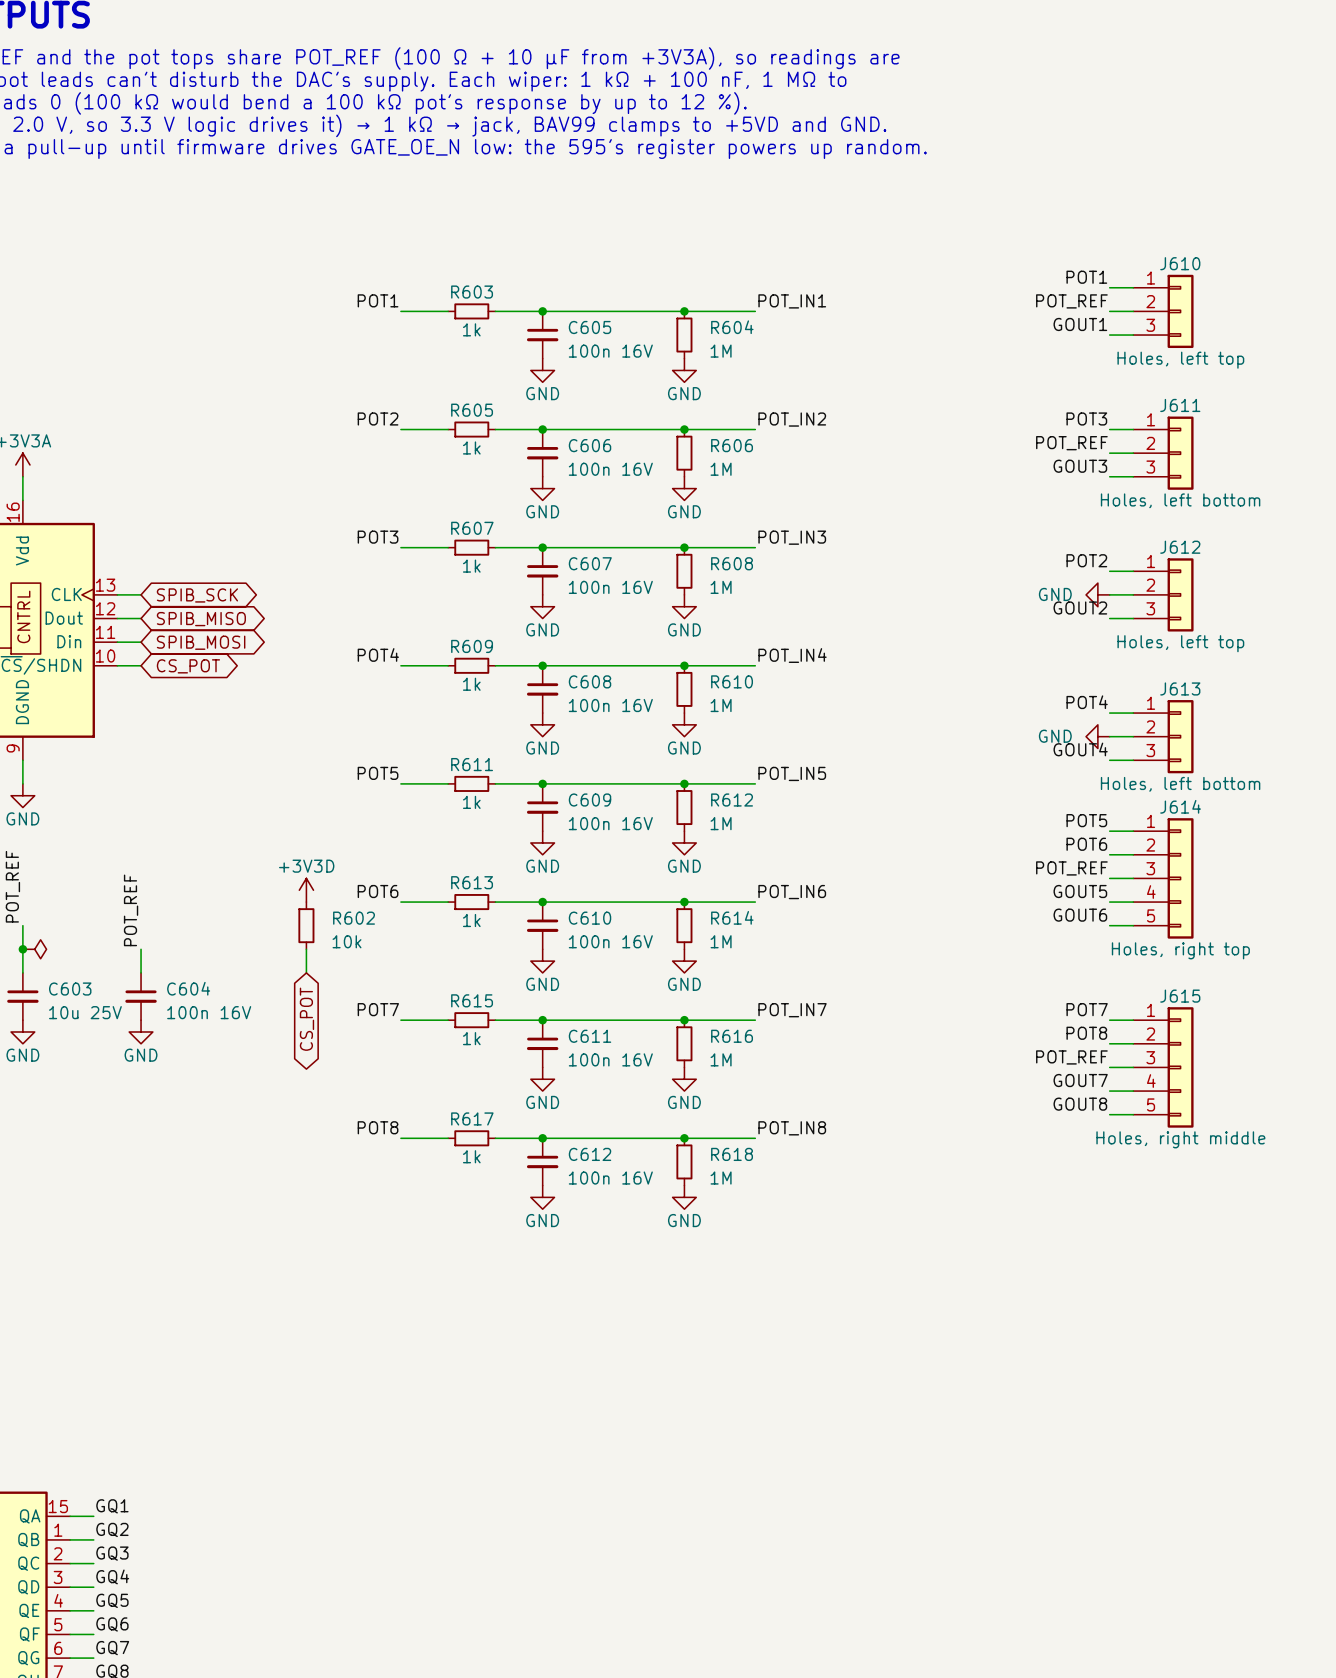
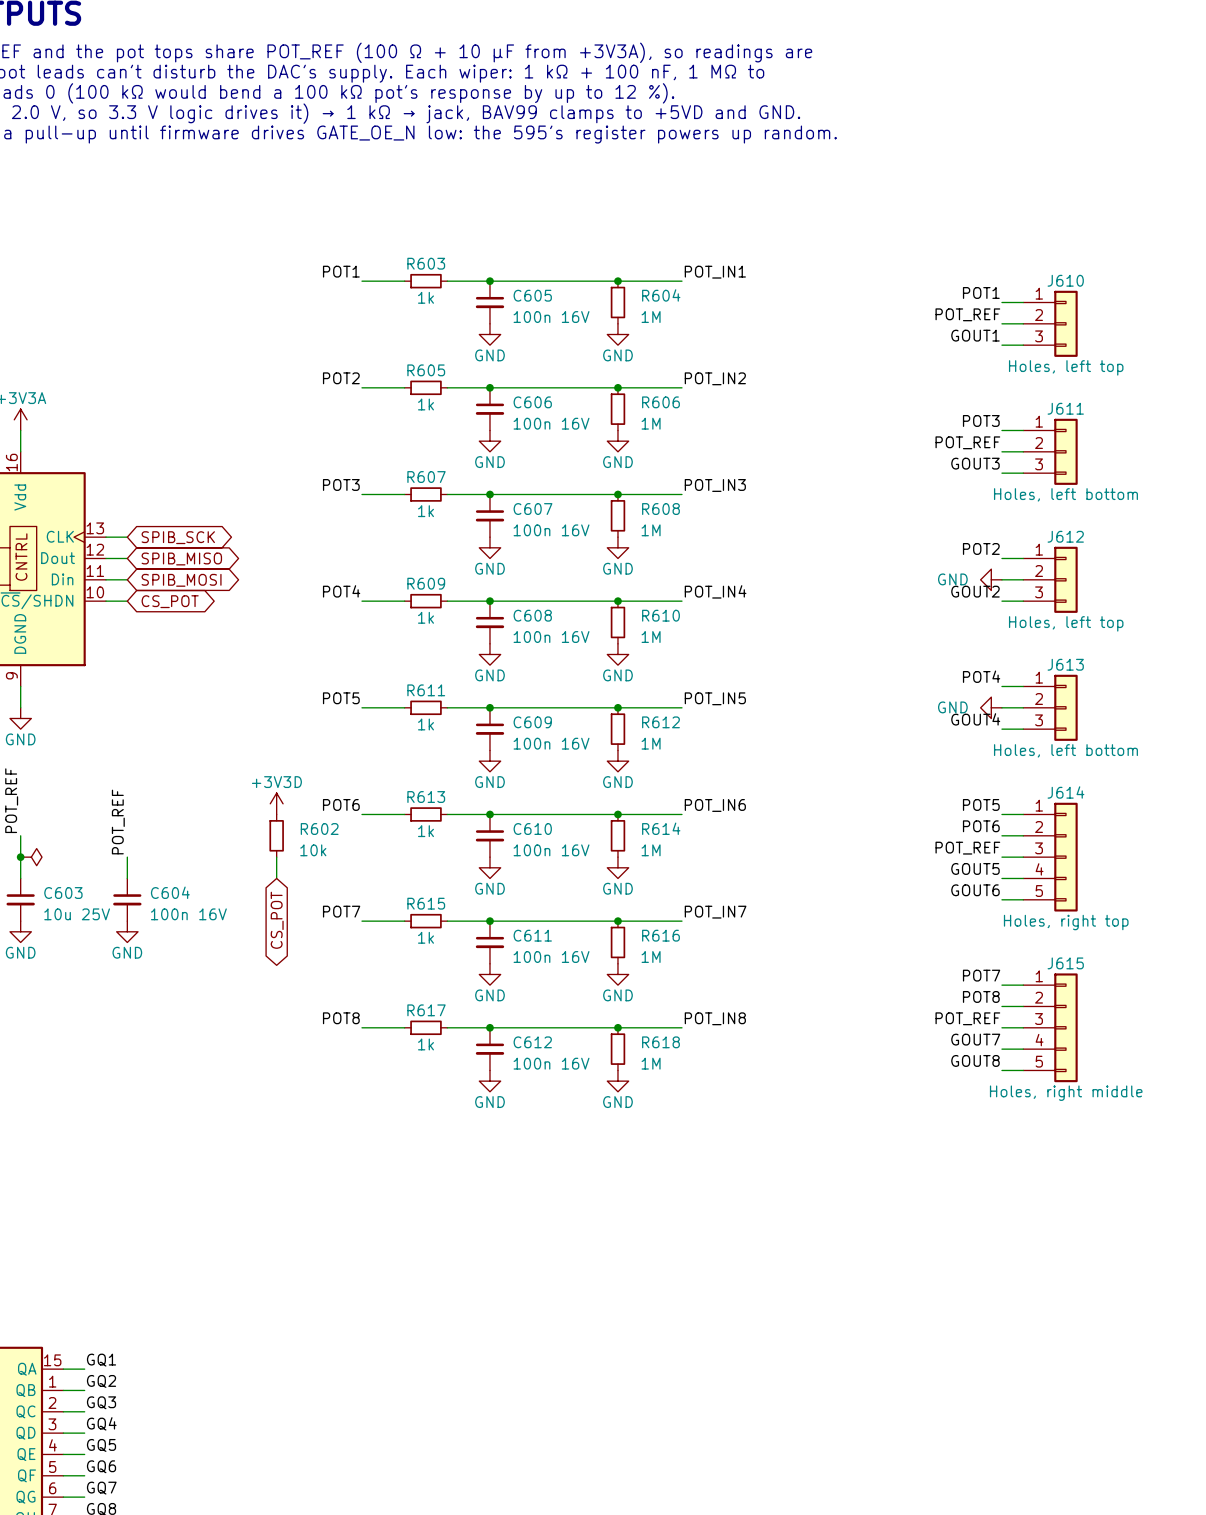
label: POT1 (1086, 277) -> none
wire: (1109, 287) (1133, 287) -> none
label: POT_REF (1071, 301) -> none
wire: (1109, 311) (1133, 311) -> none
J610 position: (1163, 311) -> (1050, 323)
label: GOUT1 (1080, 324) -> POT1 (981, 292)
label: none -> POT_REF (967, 314)
label: none -> GOUT1 (975, 335)
label: POT3 (1086, 418) -> none
wire: (1109, 429) (1133, 429) -> (1001, 323) (1023, 323)
label: POT_REF (1071, 443) -> none
wire: (1109, 453) (1133, 453) -> (1001, 345) (1023, 345)
J611 position: (1163, 453) -> (1050, 451)
label: GOUT3 (1080, 466) -> POT3 (981, 420)
label: none -> POT_REF (967, 442)
label: none -> GOUT3 (975, 463)
label: POT2 (1086, 560) -> none
wire: (1109, 571) (1133, 571) -> (1001, 451) (1023, 451)
power symbol: GND (1097, 594) -> none
wire: (1109, 594) (1133, 594) -> (1001, 473) (1023, 473)
J612 position: (1163, 594) -> (1050, 579)
label: GOUT2 (1080, 607) -> POT2 (981, 548)
power symbol: none -> GND (991, 579)
label: none -> GOUT2 (975, 591)
label: POT4 (1087, 702) -> none
wire: (1109, 713) (1133, 713) -> (1001, 579) (1023, 579)
power symbol: GND (1097, 736) -> none
wire: (1109, 736) (1133, 736) -> (1001, 601) (1023, 601)
J613 position: (1163, 736) -> (1050, 707)
label: GOUT4 (1080, 749) -> POT4 (981, 676)
power symbol: none -> GND (991, 707)
label: none -> GOUT4 (975, 719)
label: POT5 (1086, 820) -> none
wire: (1109, 831) (1133, 831) -> none
label: POT6 (1086, 844) -> none
wire: (1109, 854) (1133, 854) -> (1001, 707) (1023, 707)
label: POT_REF (1071, 868) -> none
wire: (1109, 878) (1133, 878) -> (1001, 729) (1023, 729)
J614 position: (1163, 878) -> (1050, 857)
label: GOUT5 (1080, 891) -> POT5 (981, 804)
label: GOUT6 (1080, 915) -> POT6 (981, 826)
label: none -> POT_REF (967, 848)
label: none -> GOUT5 (975, 868)
label: none -> GOUT6 (975, 890)
label: POT7 (1087, 1009) -> none
wire: (1109, 1020) (1133, 1020) -> (1001, 857) (1023, 857)
label: POT8 (1086, 1033) -> none
wire: (1109, 1043) (1133, 1043) -> (1001, 878) (1023, 878)
label: POT_REF (1071, 1057) -> none
wire: (1109, 1067) (1133, 1067) -> (1001, 899) (1023, 899)
J615 position: (1163, 1067) -> (1050, 1027)
label: GOUT7 (1080, 1080) -> POT7 (981, 975)
label: GOUT8 (1080, 1104) -> POT8 (981, 996)
label: none -> POT_REF (967, 1018)
wire: none -> (1001, 1027) (1023, 1027)
label: none -> GOUT7 (975, 1039)
wire: none -> (1001, 1049) (1023, 1049)
label: none -> GOUT8 (975, 1060)
wire: none -> (1001, 1070) (1023, 1070)

